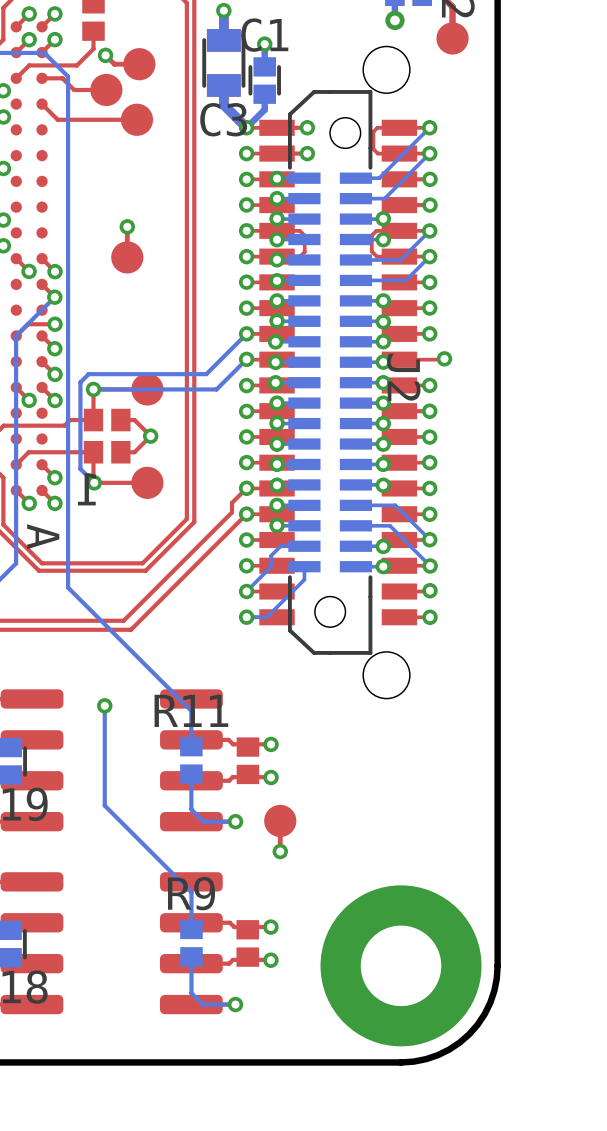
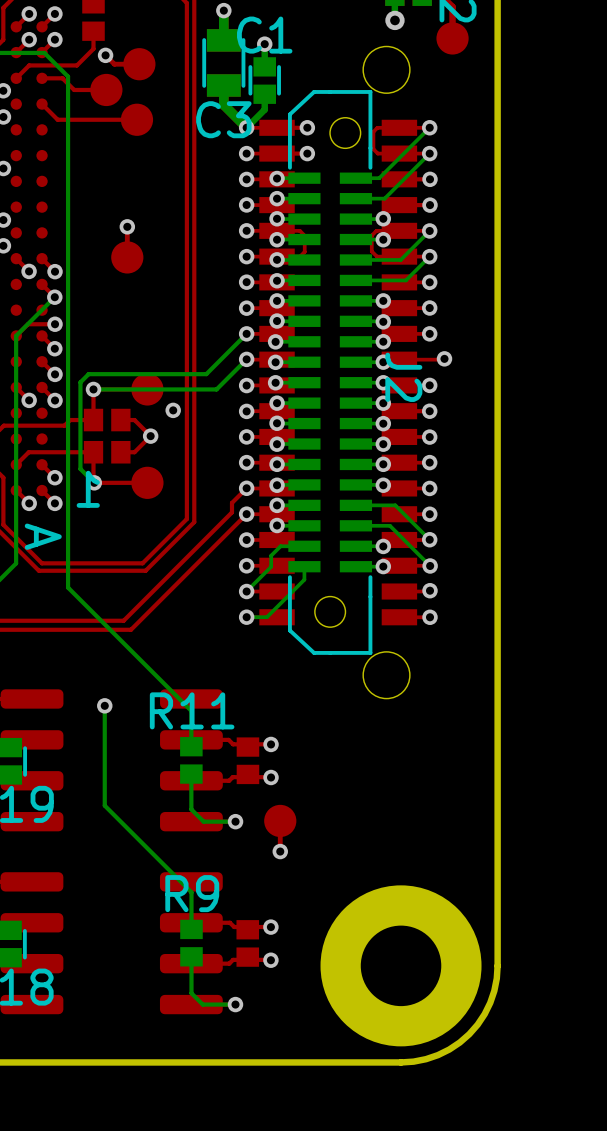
via: none -> (173, 410)

